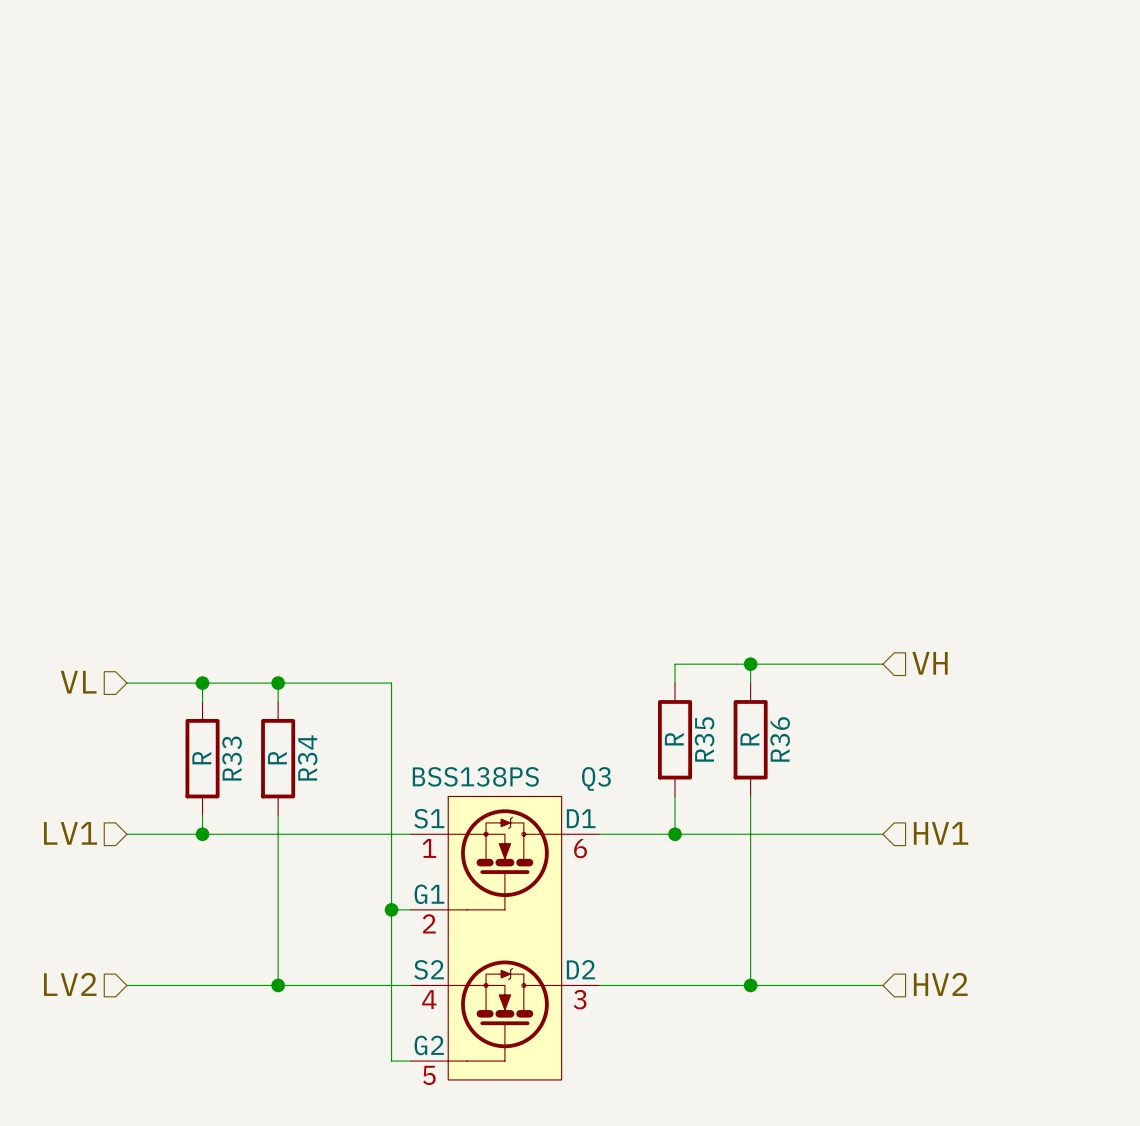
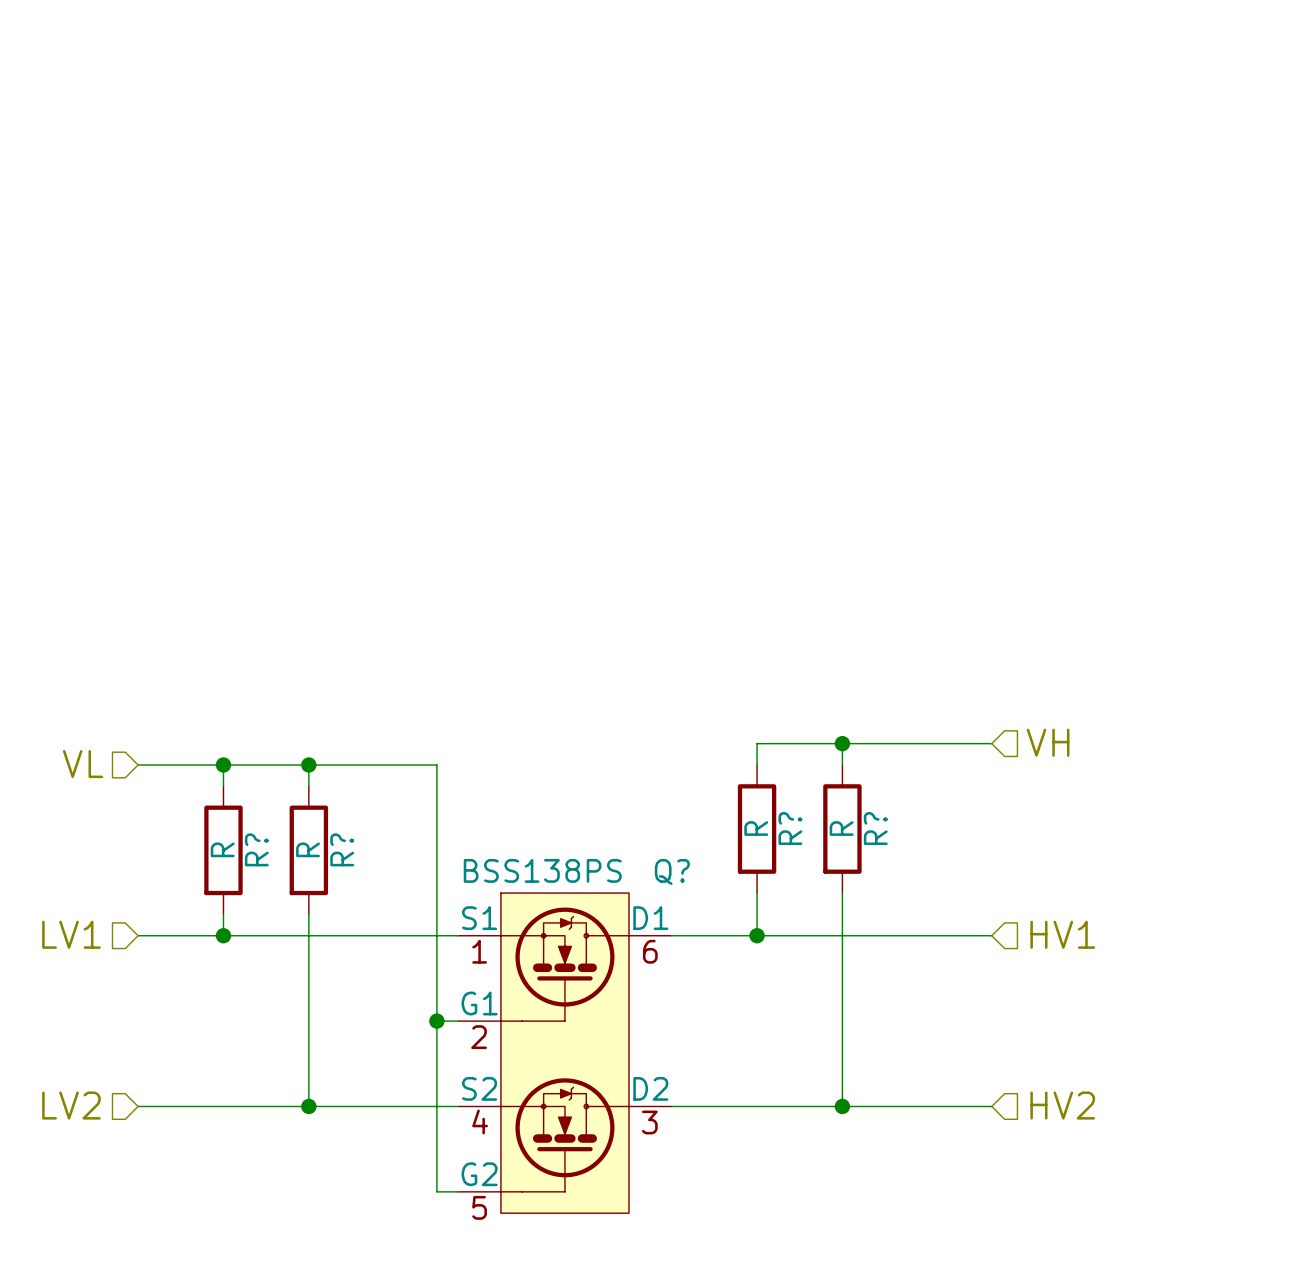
R35 name: R35 (704, 739) -> R? (790, 828)
R36 name: R36 (780, 739) -> R? (875, 828)
R34 name: R34 (307, 757) -> R? (342, 849)
R33 name: R33 (232, 758) -> R? (256, 849)
Q3 name: Q3 (596, 778) -> Q? (672, 871)

